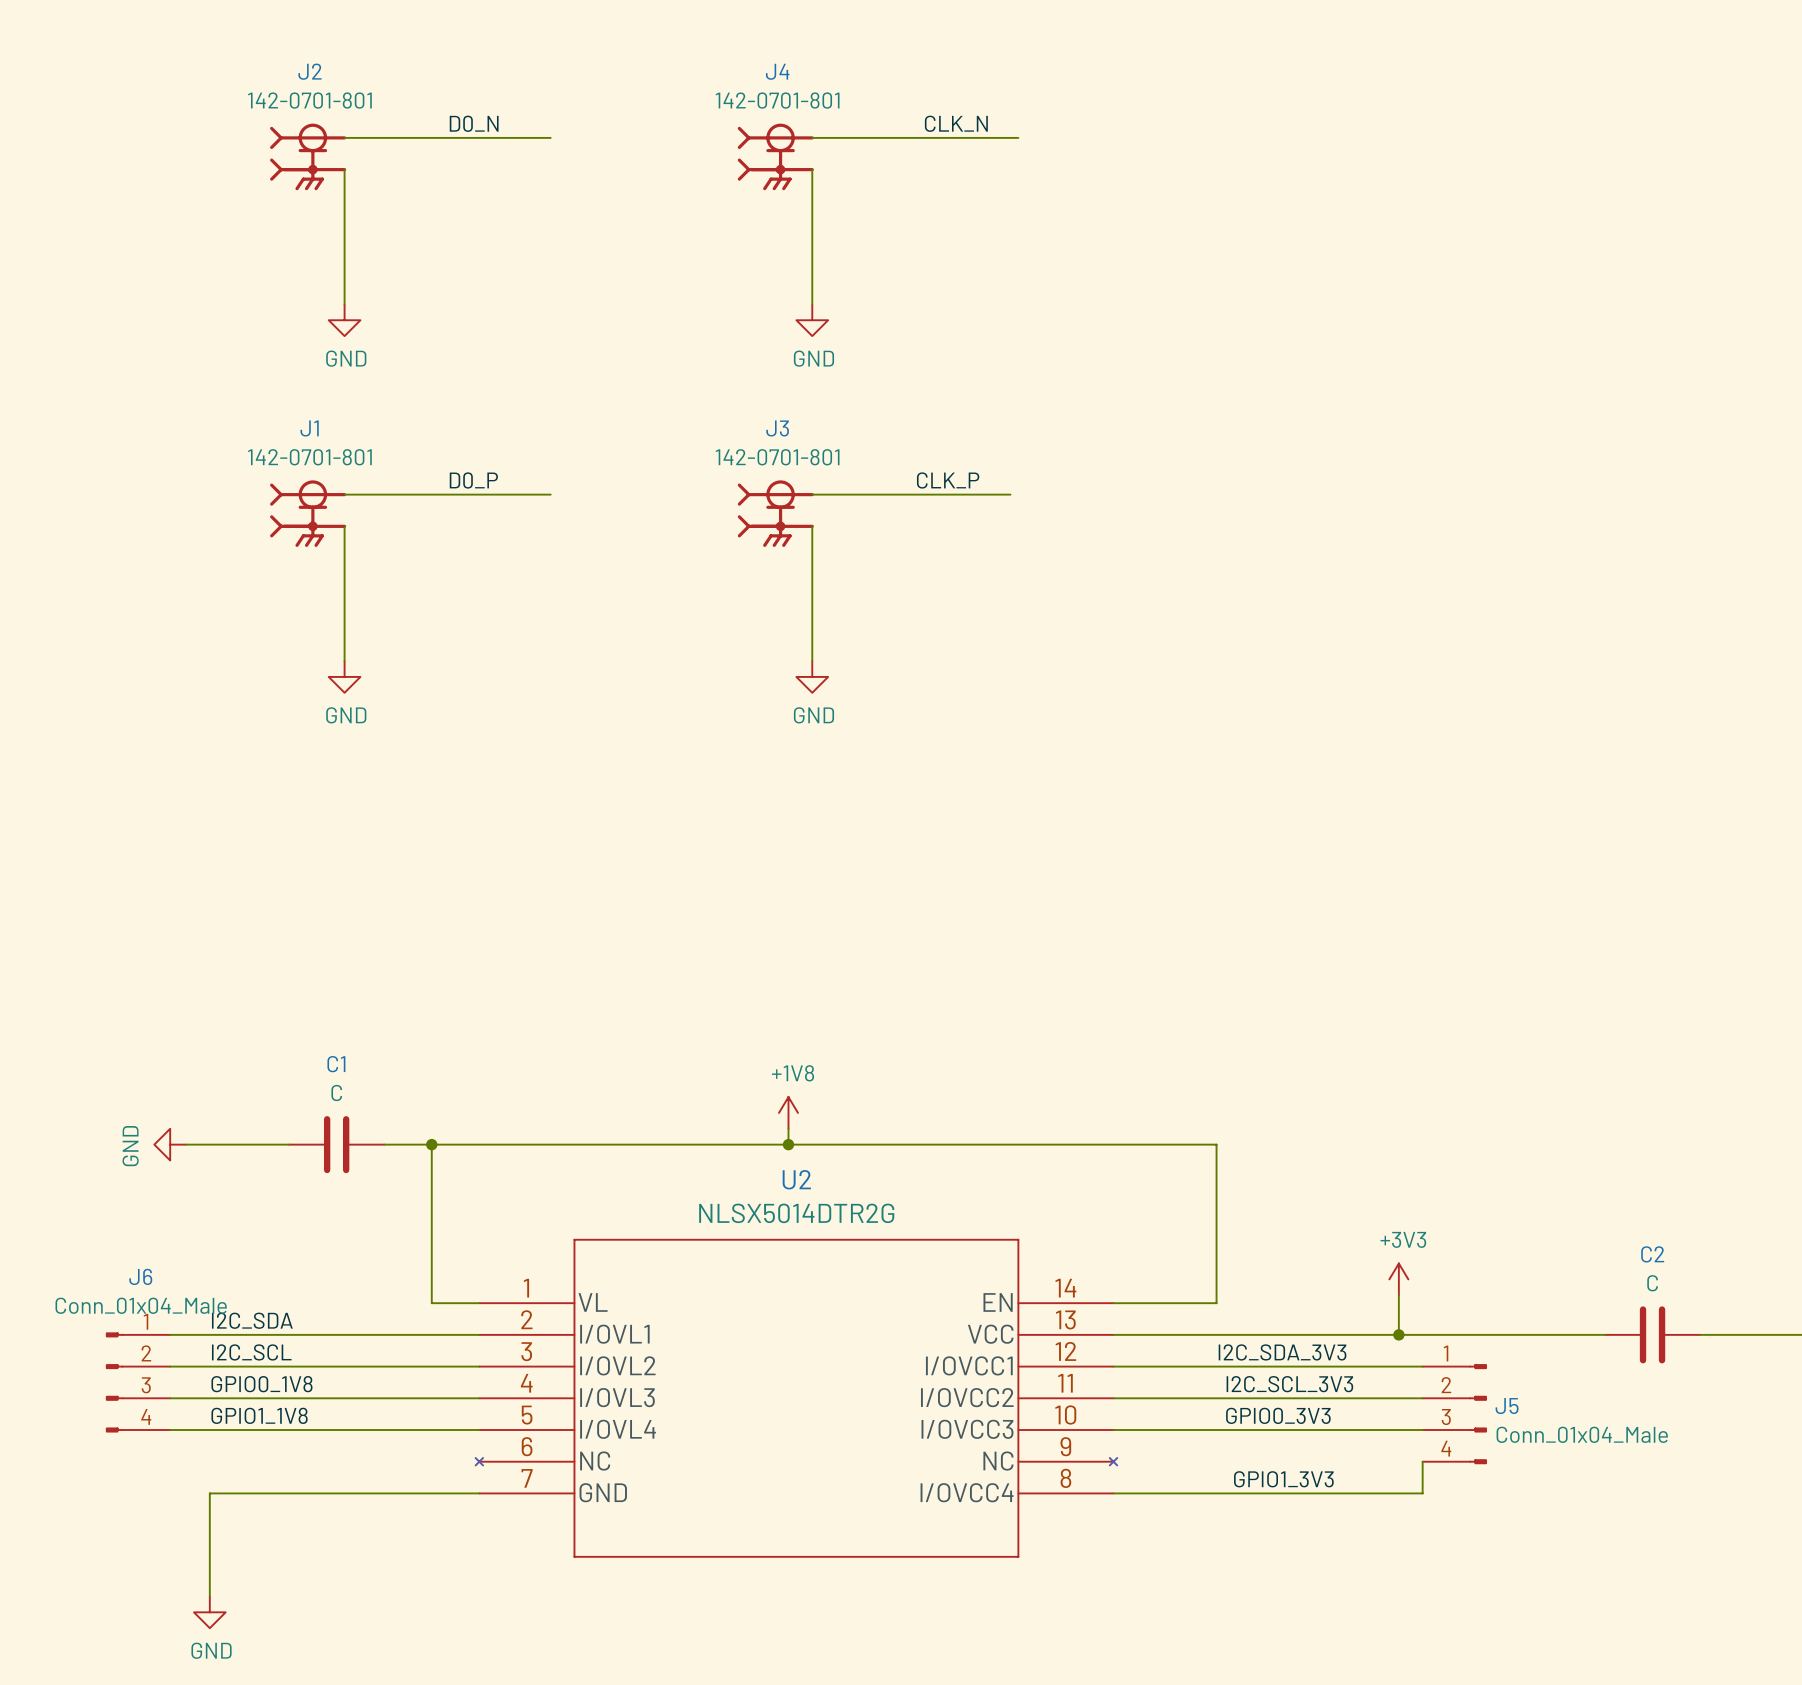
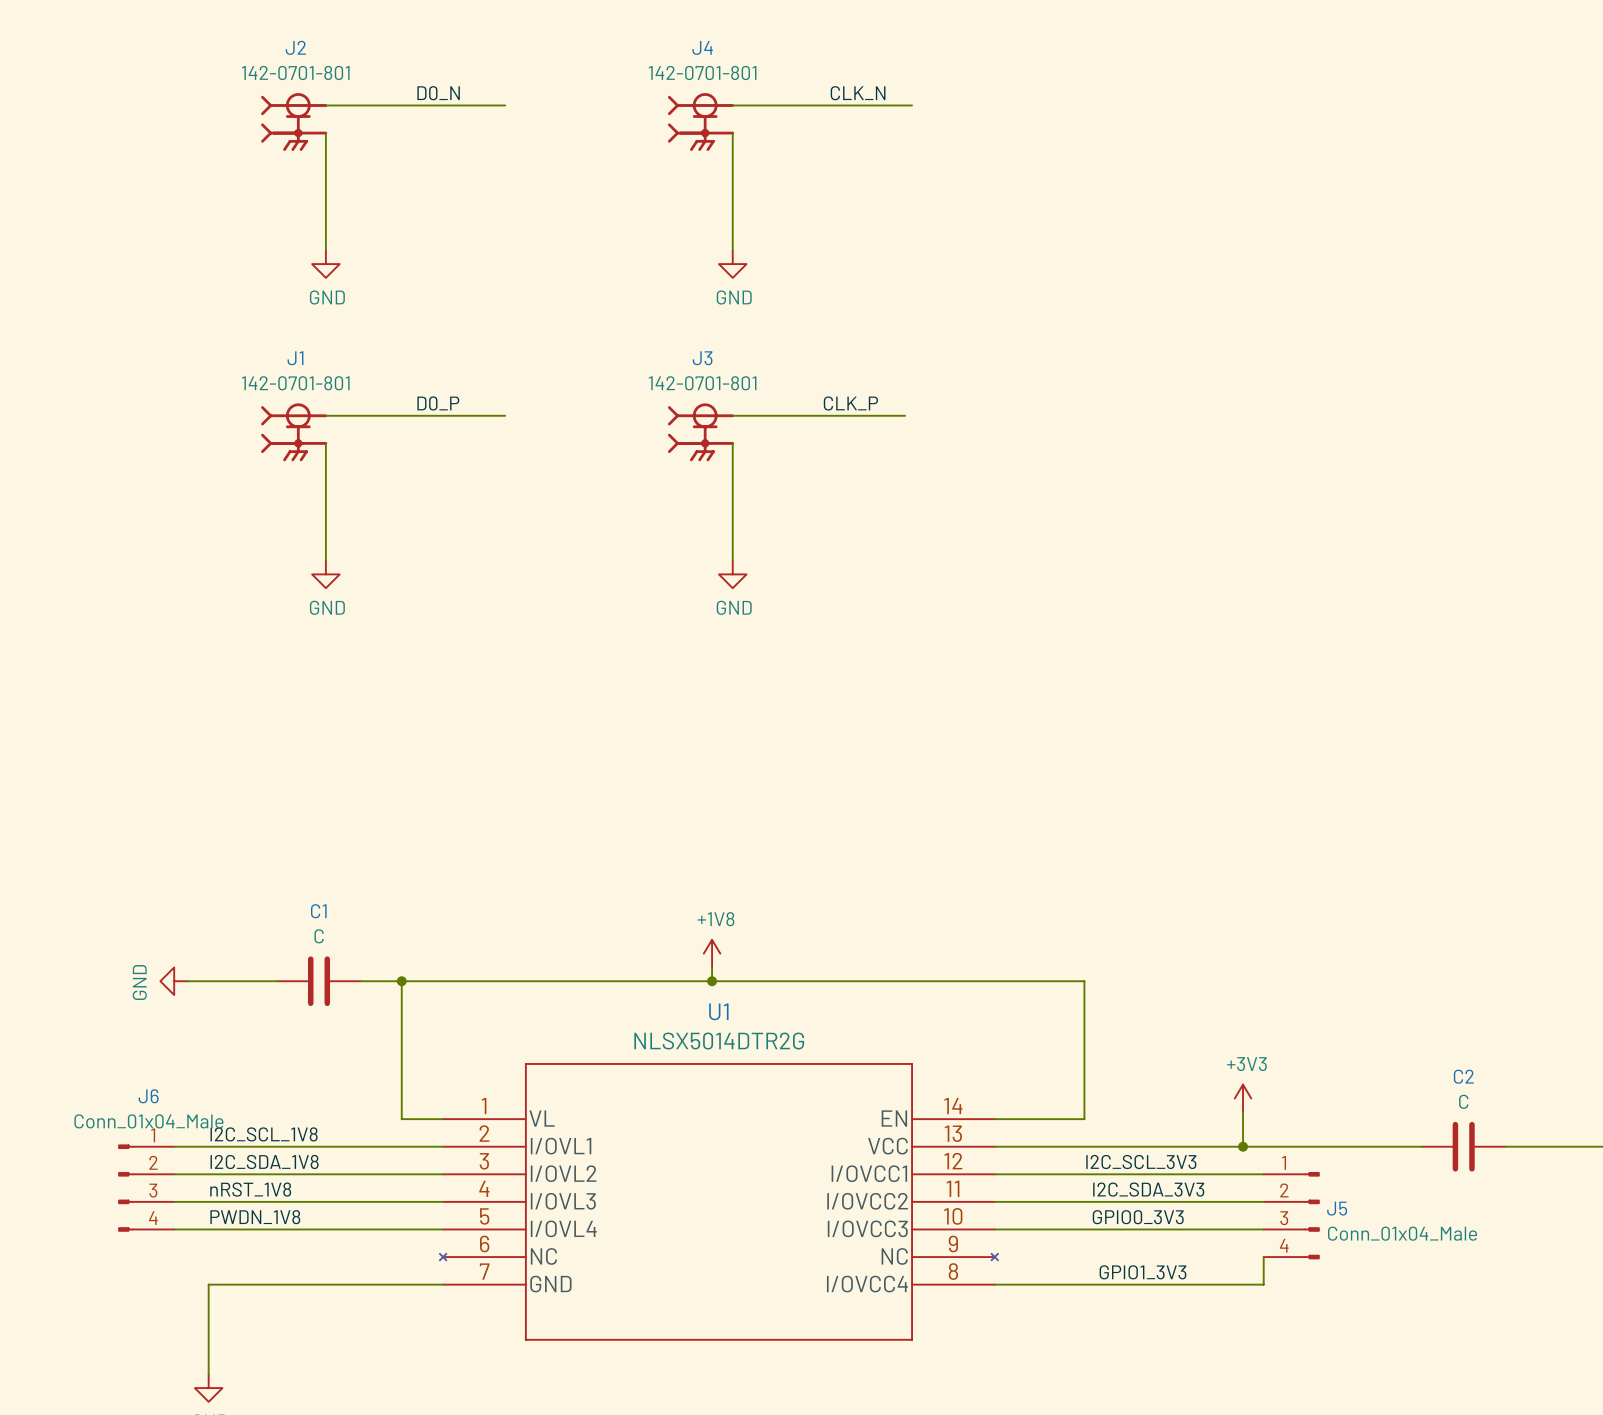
U2 name: U2 (796, 1179) -> U1 (718, 1011)
label: I2C_SDA (252, 1320) -> I2C_SCL_1V8 (264, 1134)
label: I2C_SCL (251, 1352) -> I2C_SDA_1V8 (264, 1161)
label: I2C_SDA_3V3 (1282, 1352) -> I2C_SCL_3V3 (1141, 1162)
label: GPIO0_1V8 (261, 1384) -> nRST_1V8 (250, 1189)
label: I2C_SCL_3V3 (1289, 1384) -> I2C_SDA_3V3 (1148, 1189)
label: GPIO1_1V8 (259, 1415) -> PWDN_1V8 (255, 1217)

